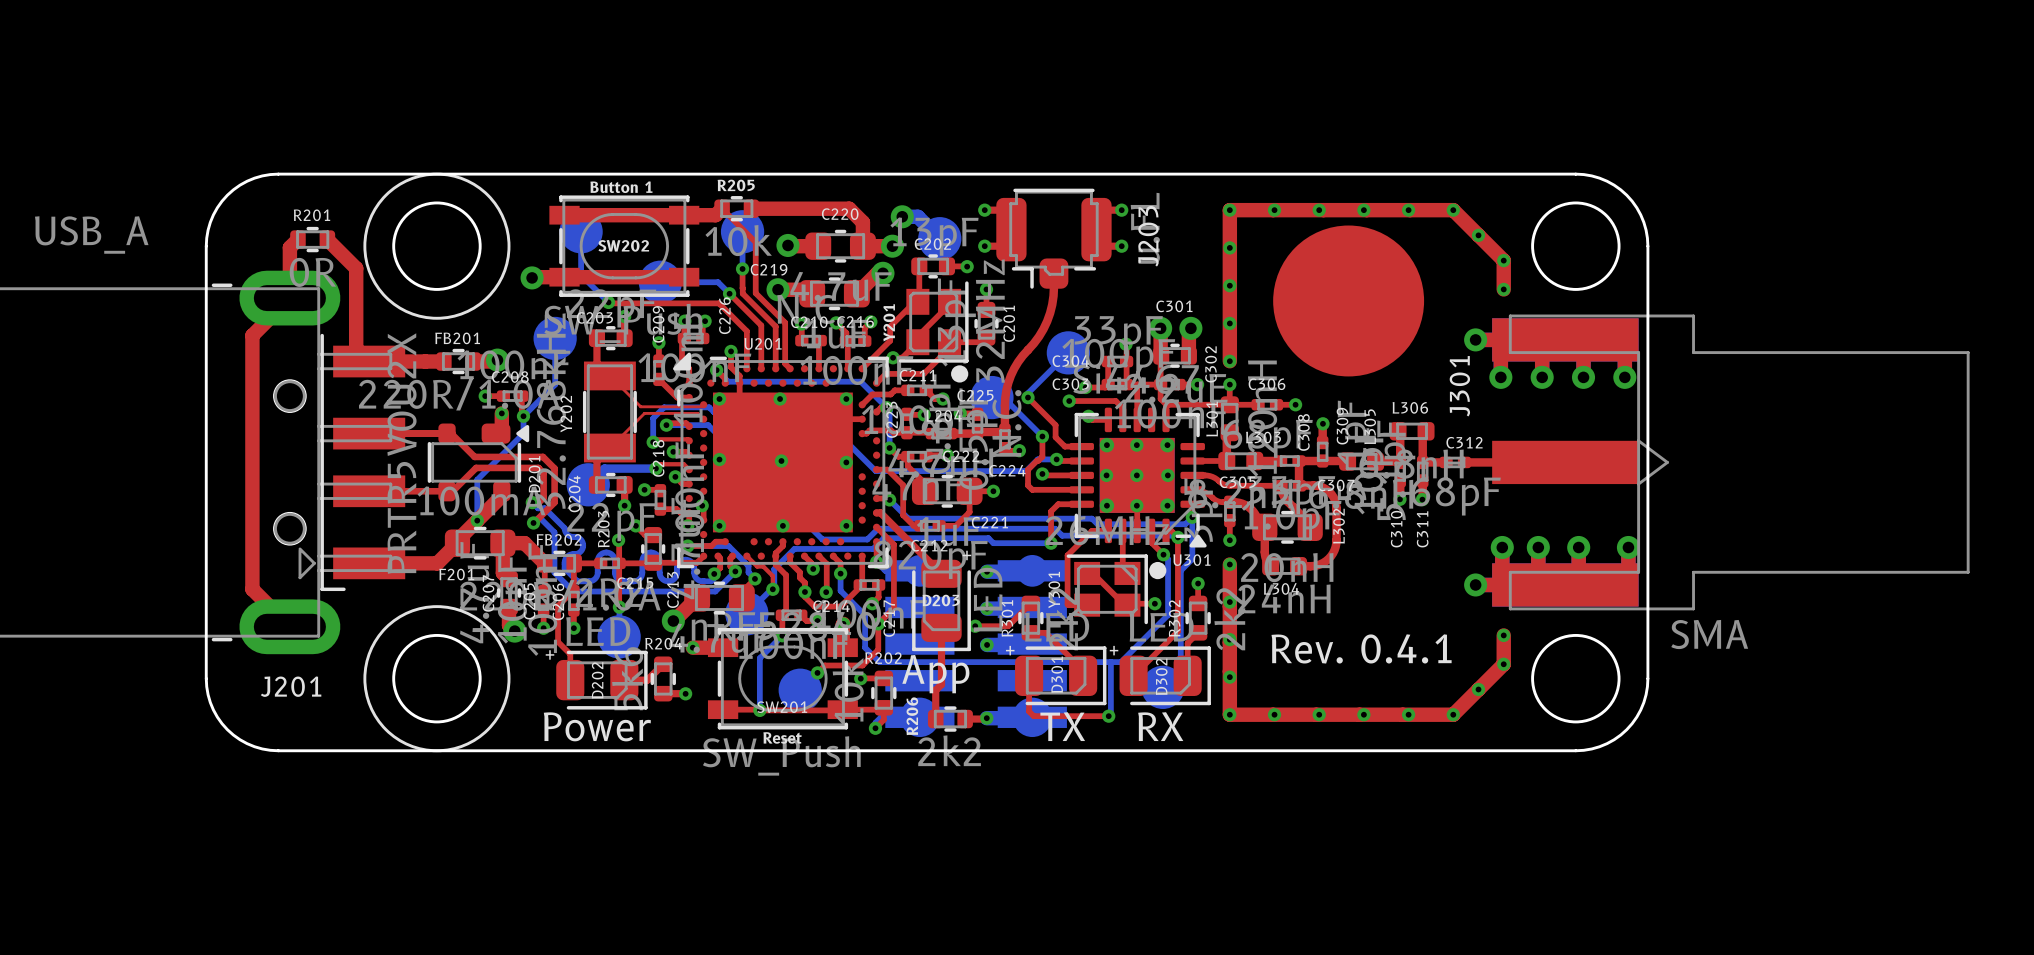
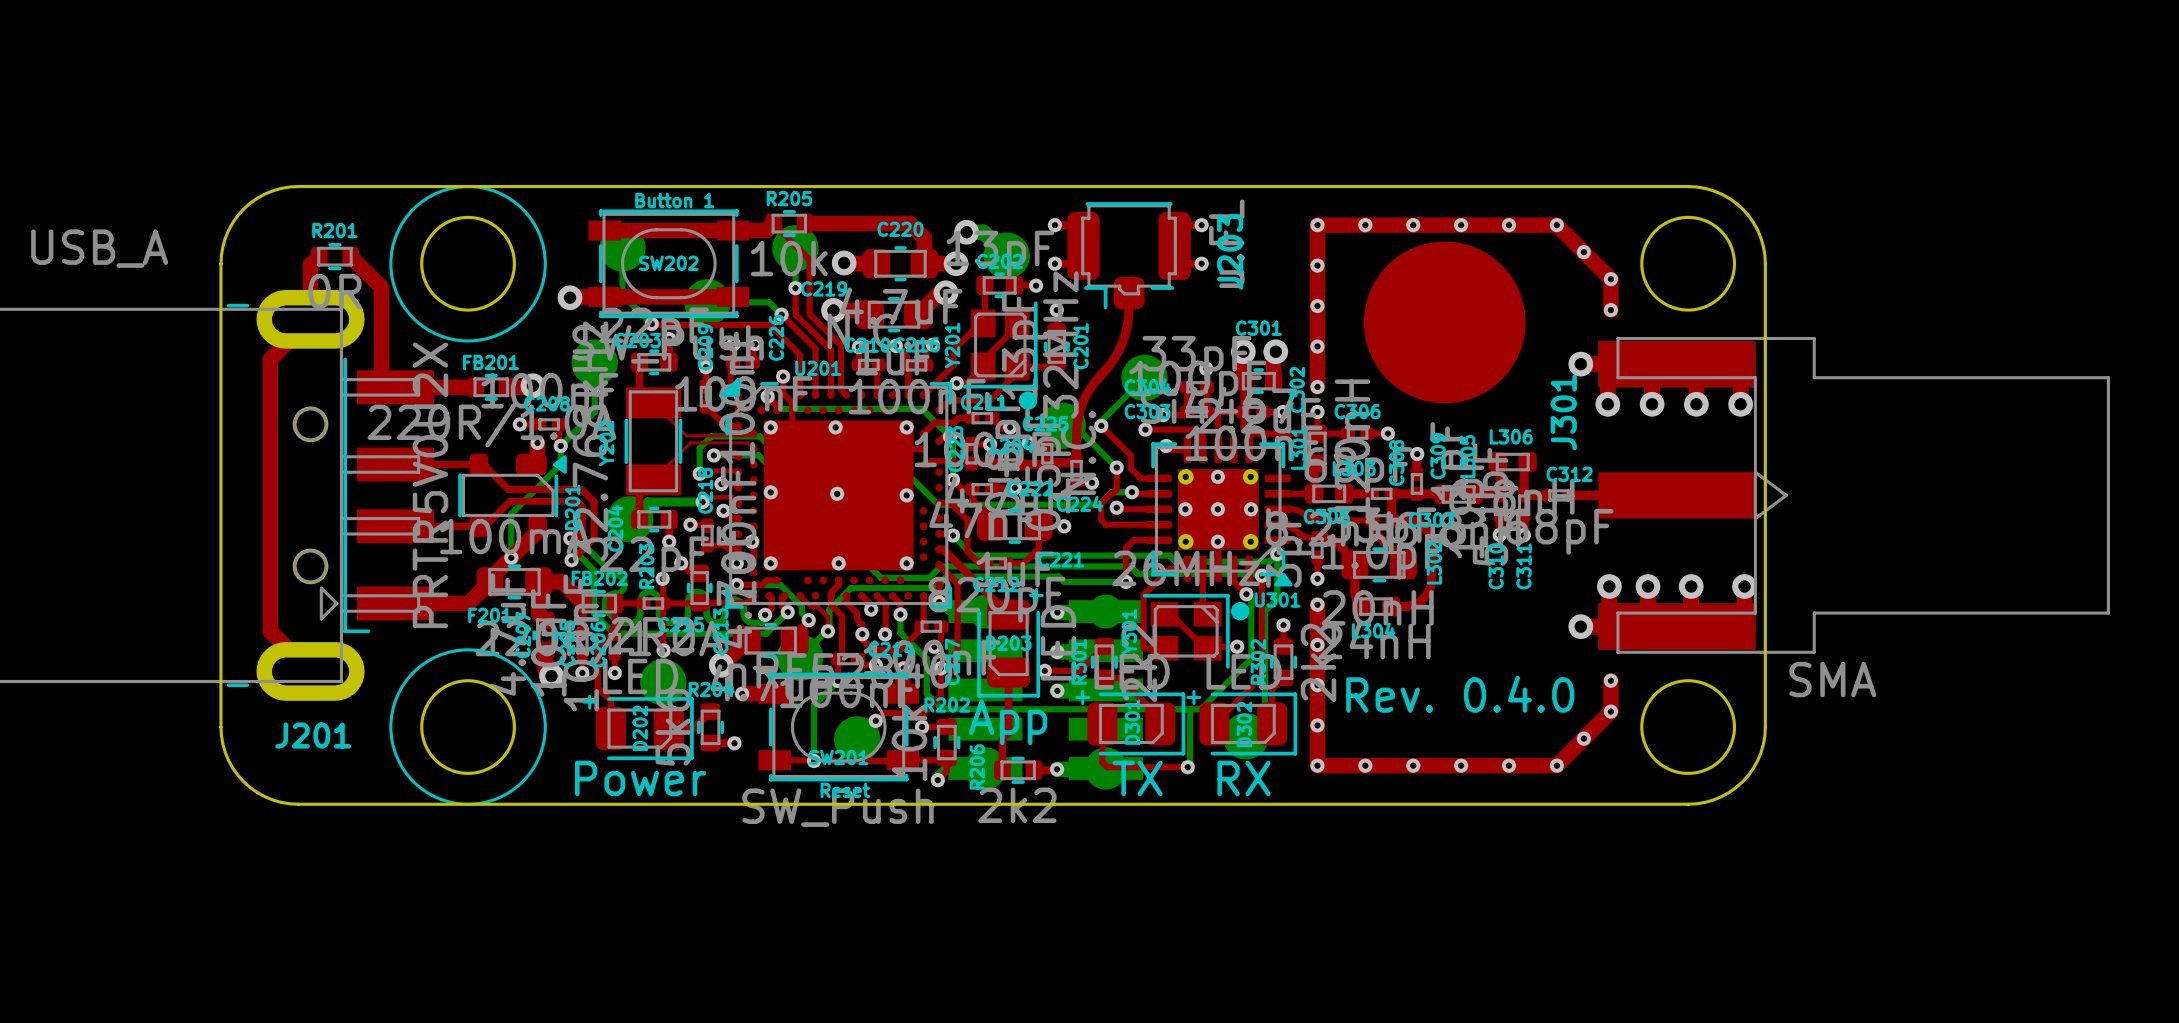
text: Rev. 0.4.1 (1361, 648) -> Rev. 0.4.0 (1460, 694)

